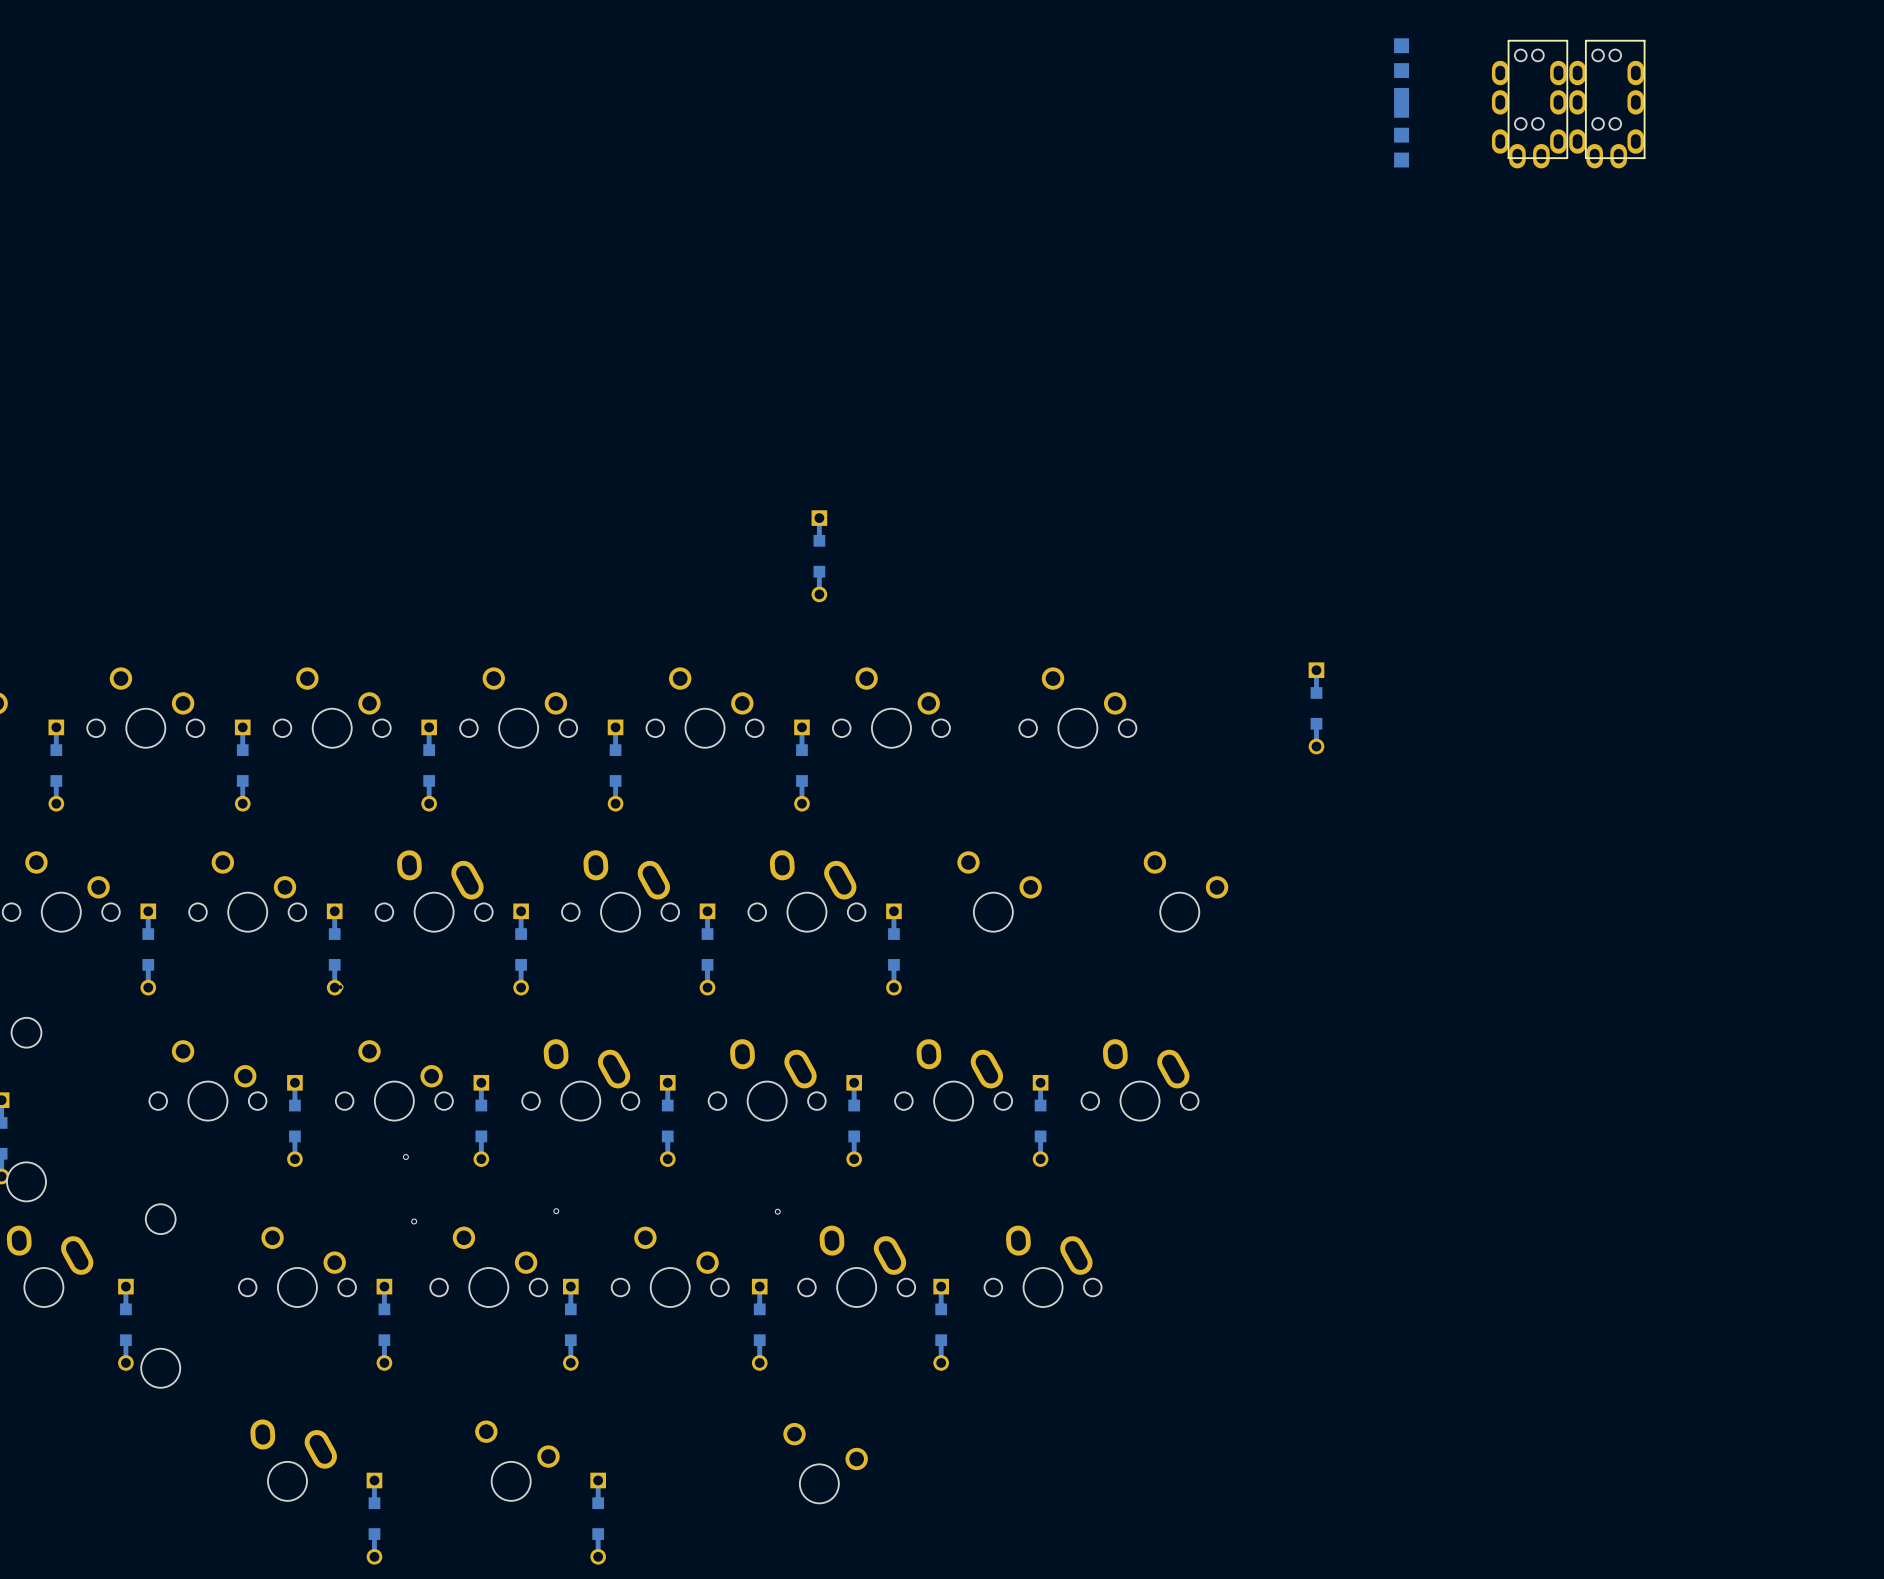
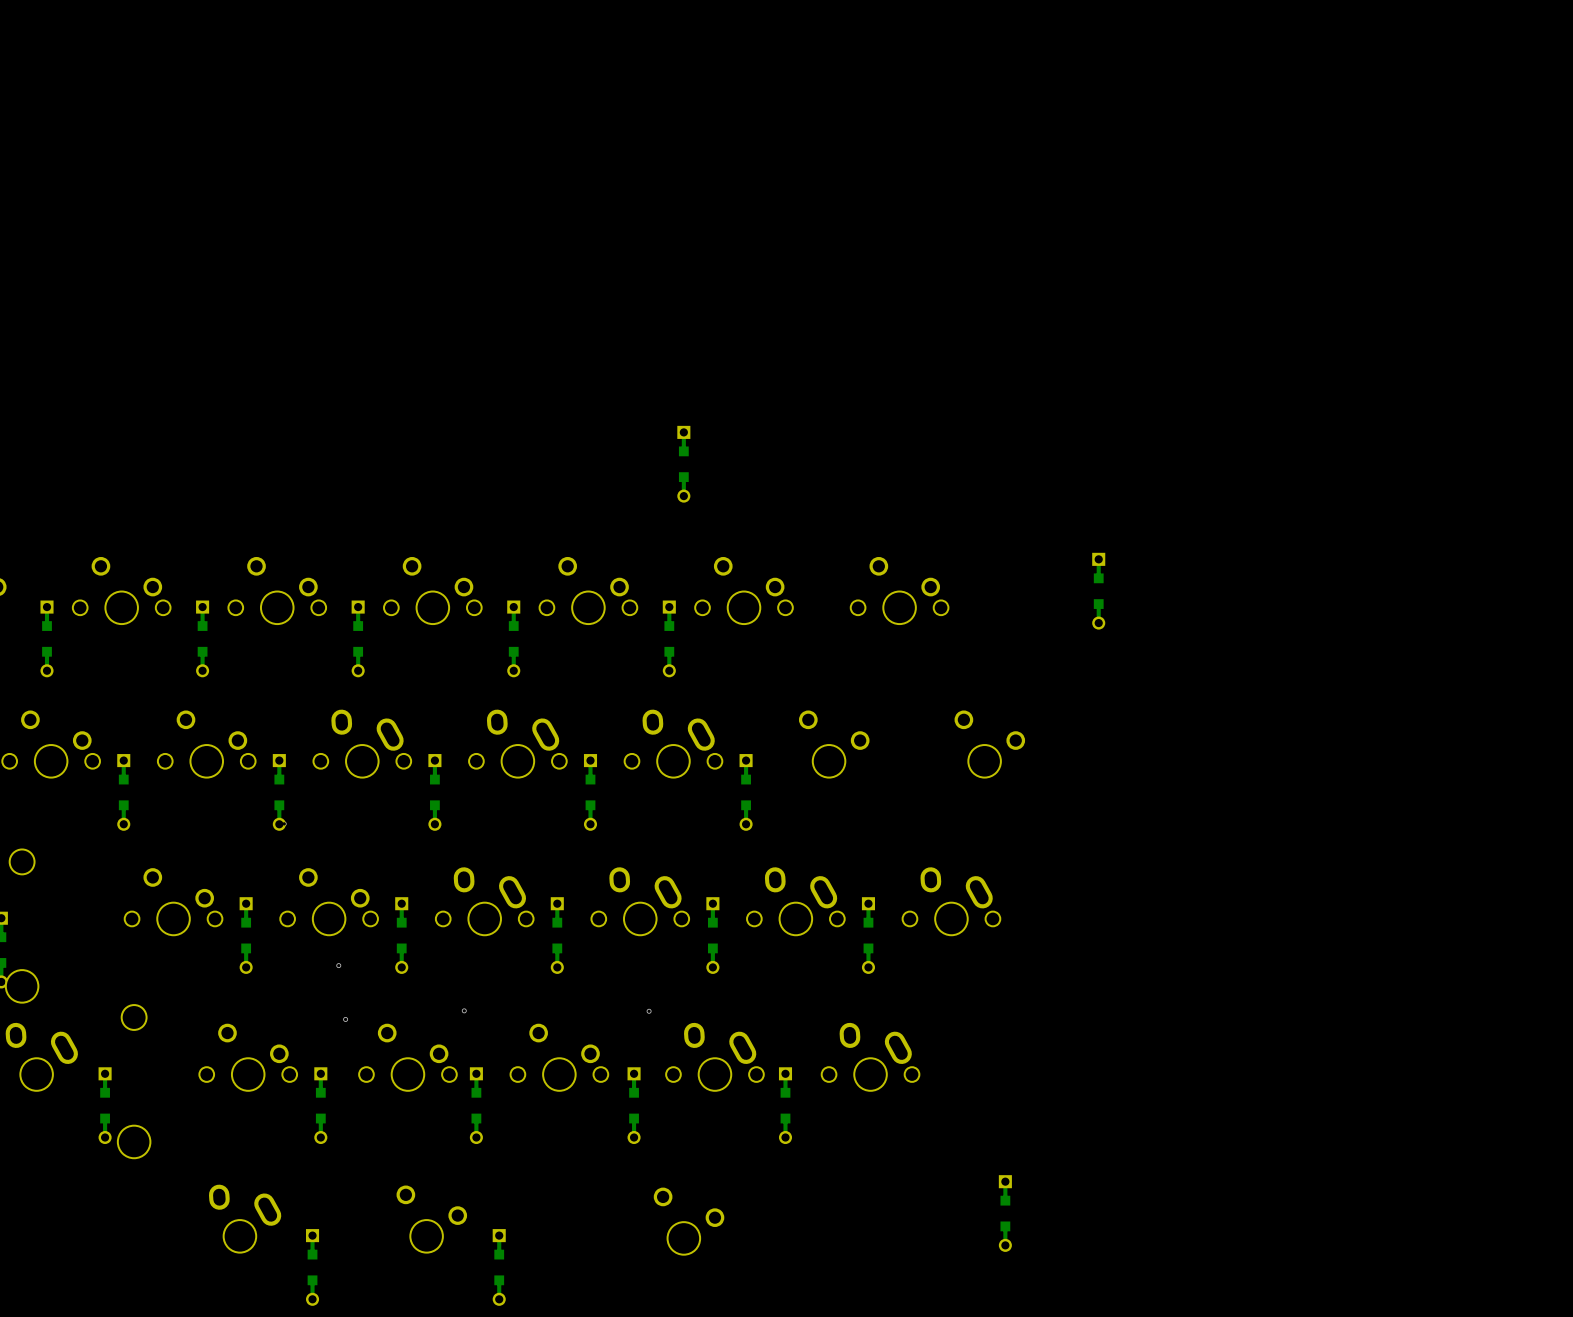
part: (1401, 70) -> none
part: (1529, 104) -> none
part: (1607, 104) -> none
part: (1401, 135) -> none
part: none -> (1005, 1213)

